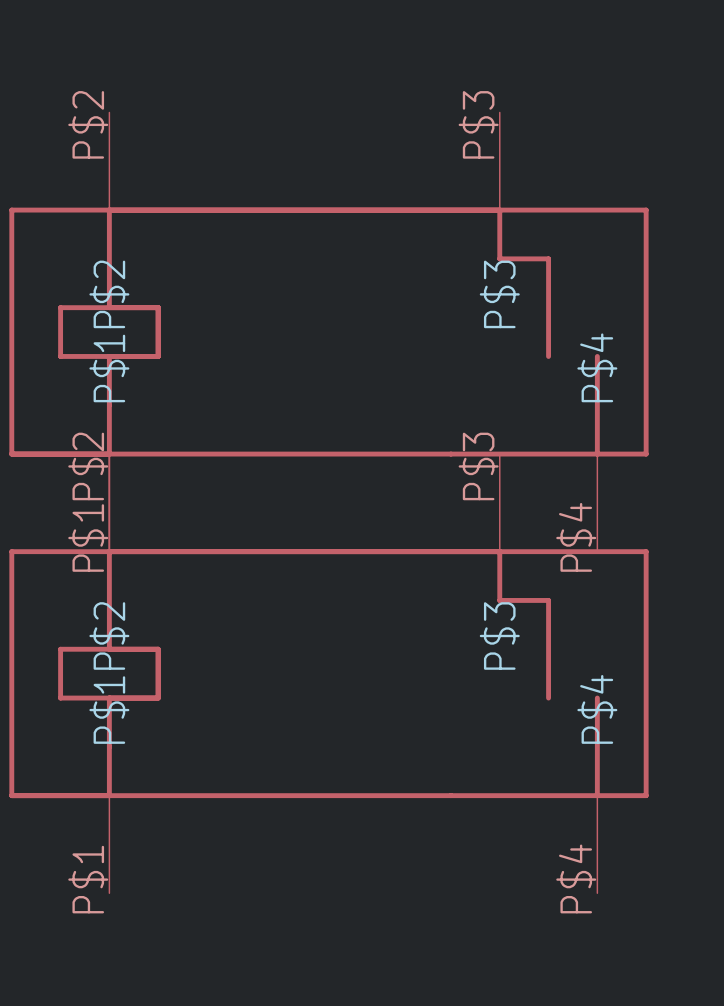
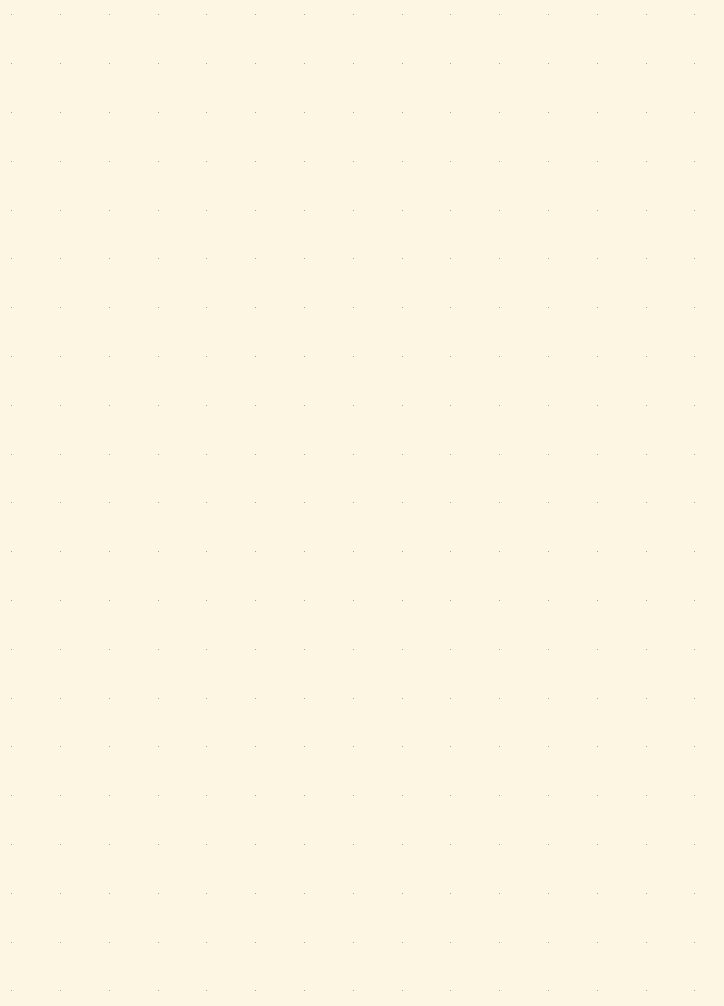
part: (328, 332) -> none
part: (328, 673) -> none

